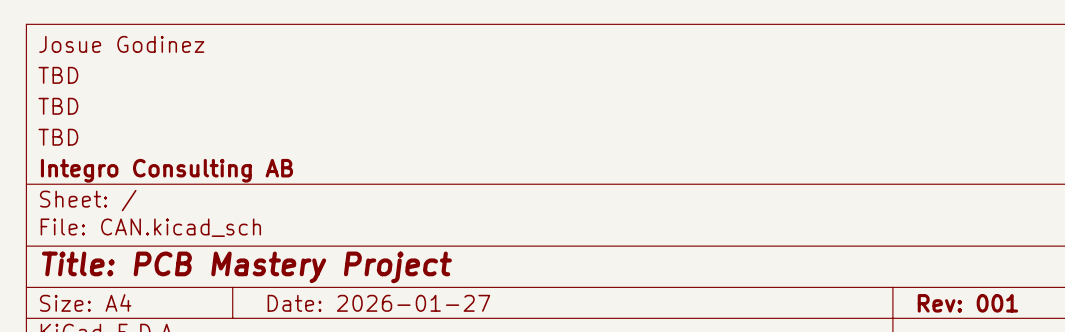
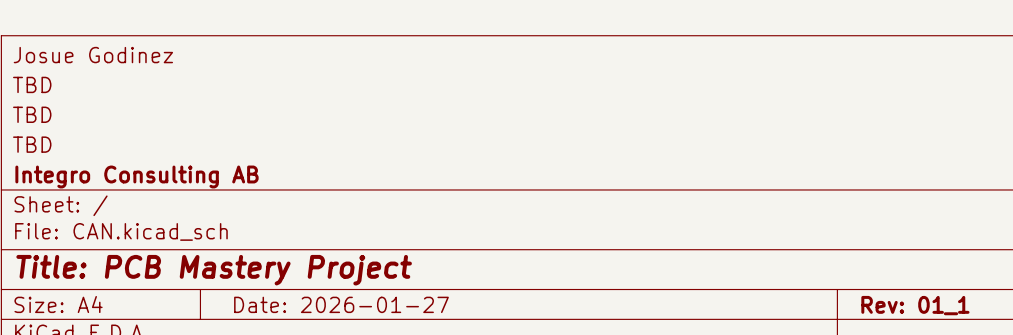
title block: Rev: 001 (967, 303) -> Rev: 01_1 (915, 305)

